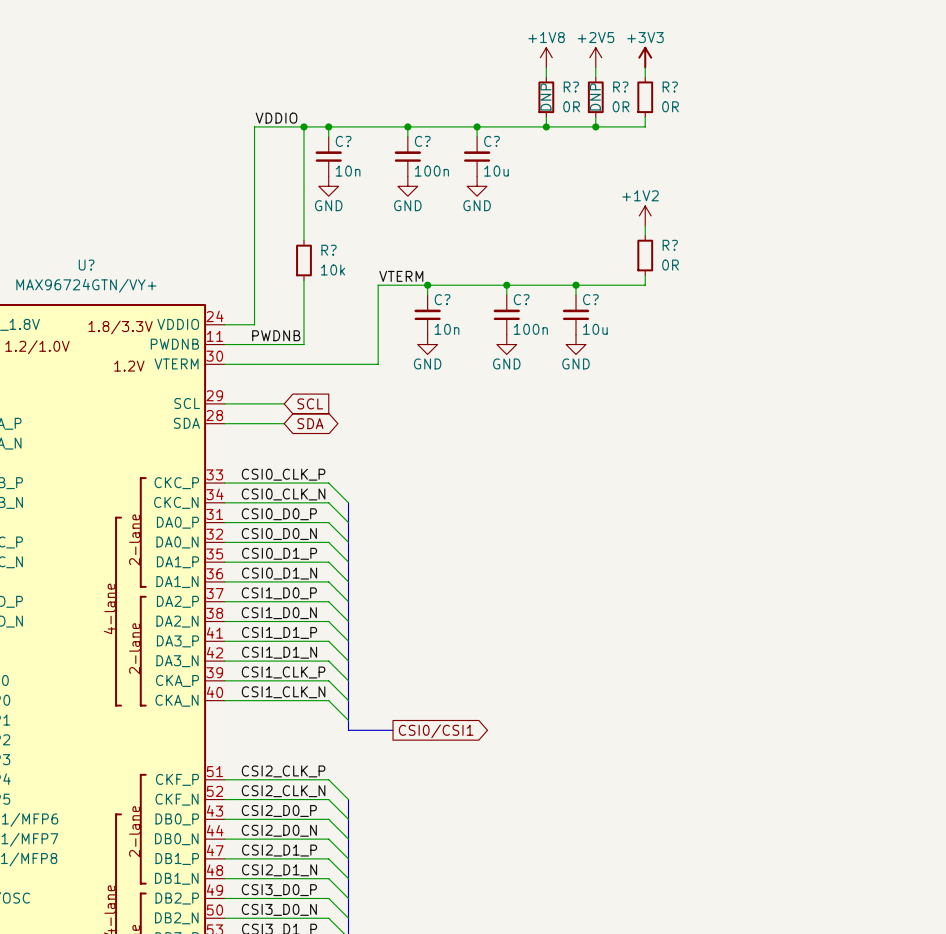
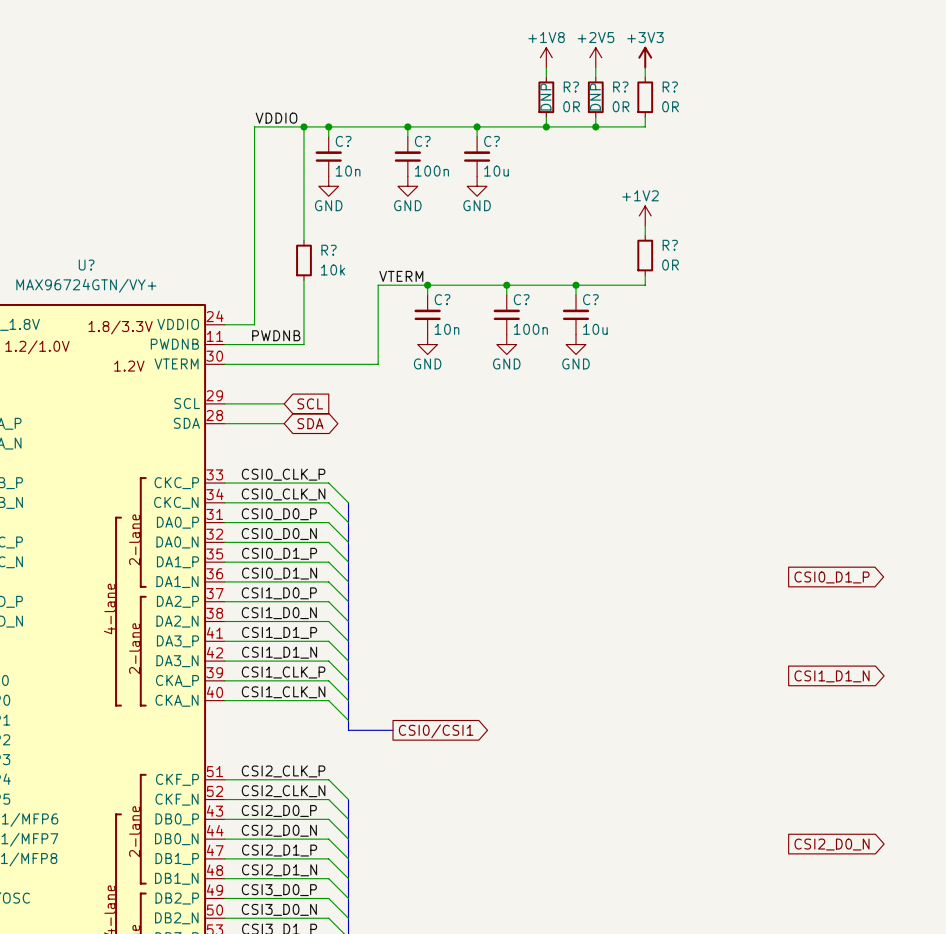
global label: none -> CSI0_D1_P (832, 577)
global label: none -> CSI1_D1_N (832, 676)
global label: none -> CSI2_D0_N (832, 844)

